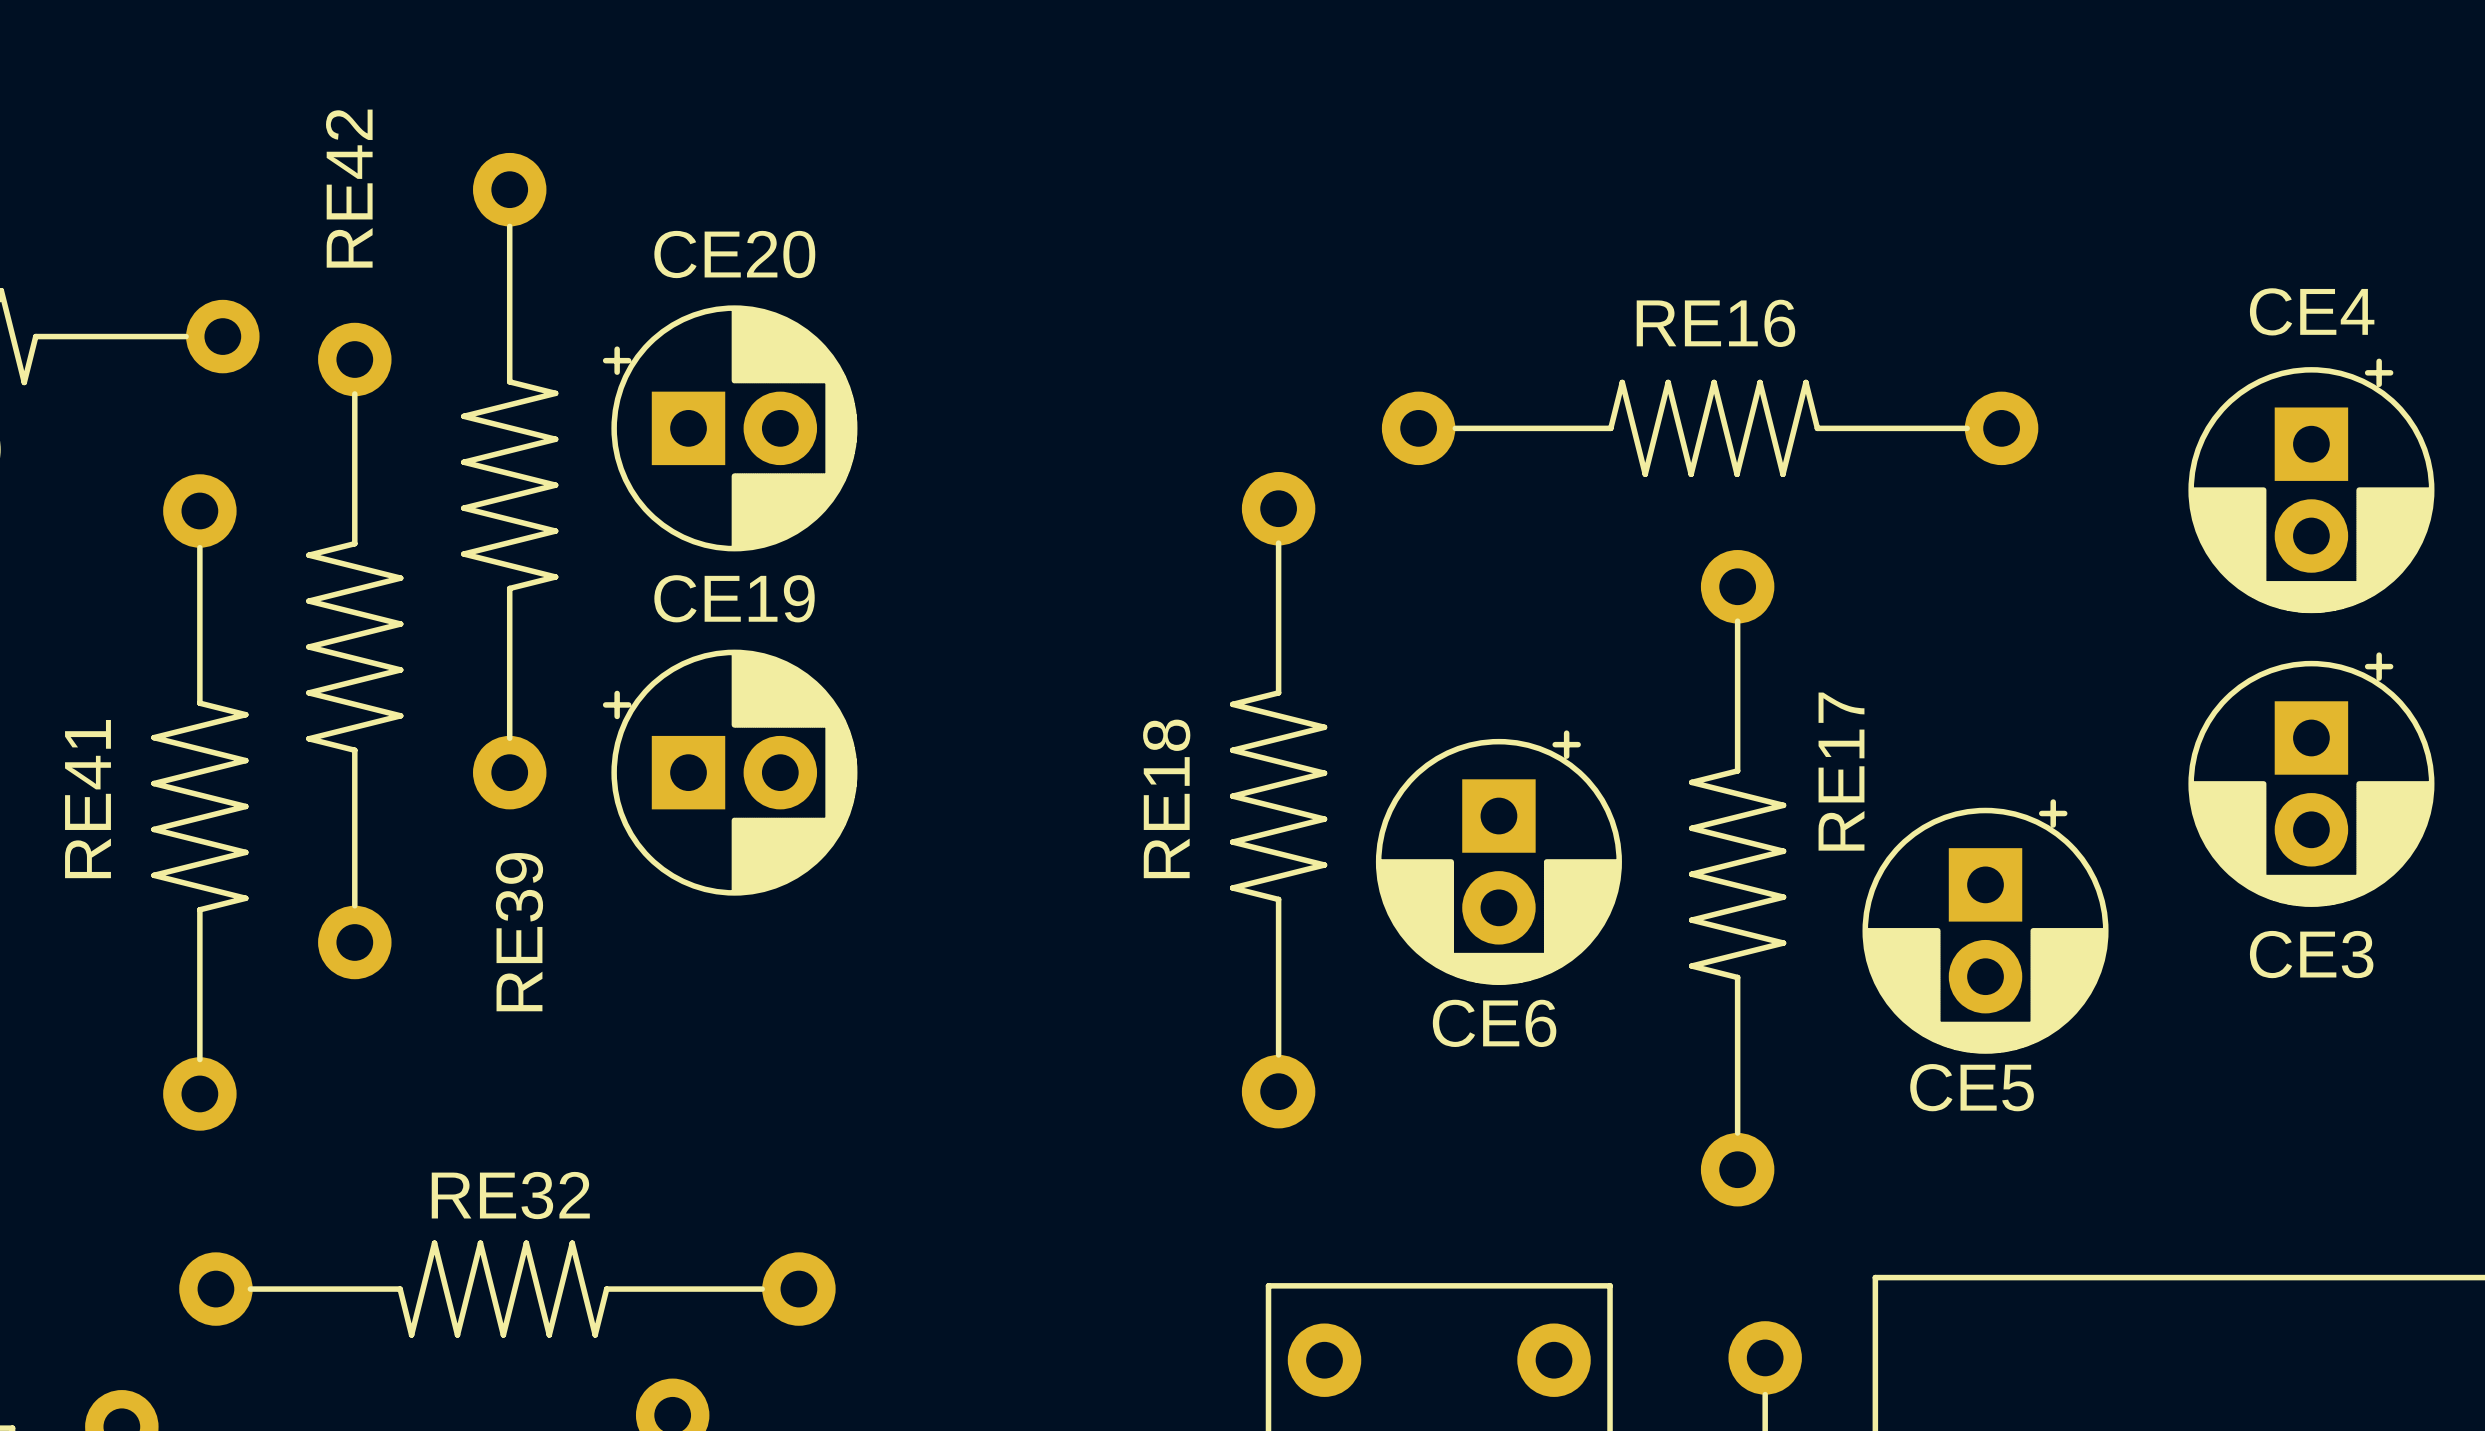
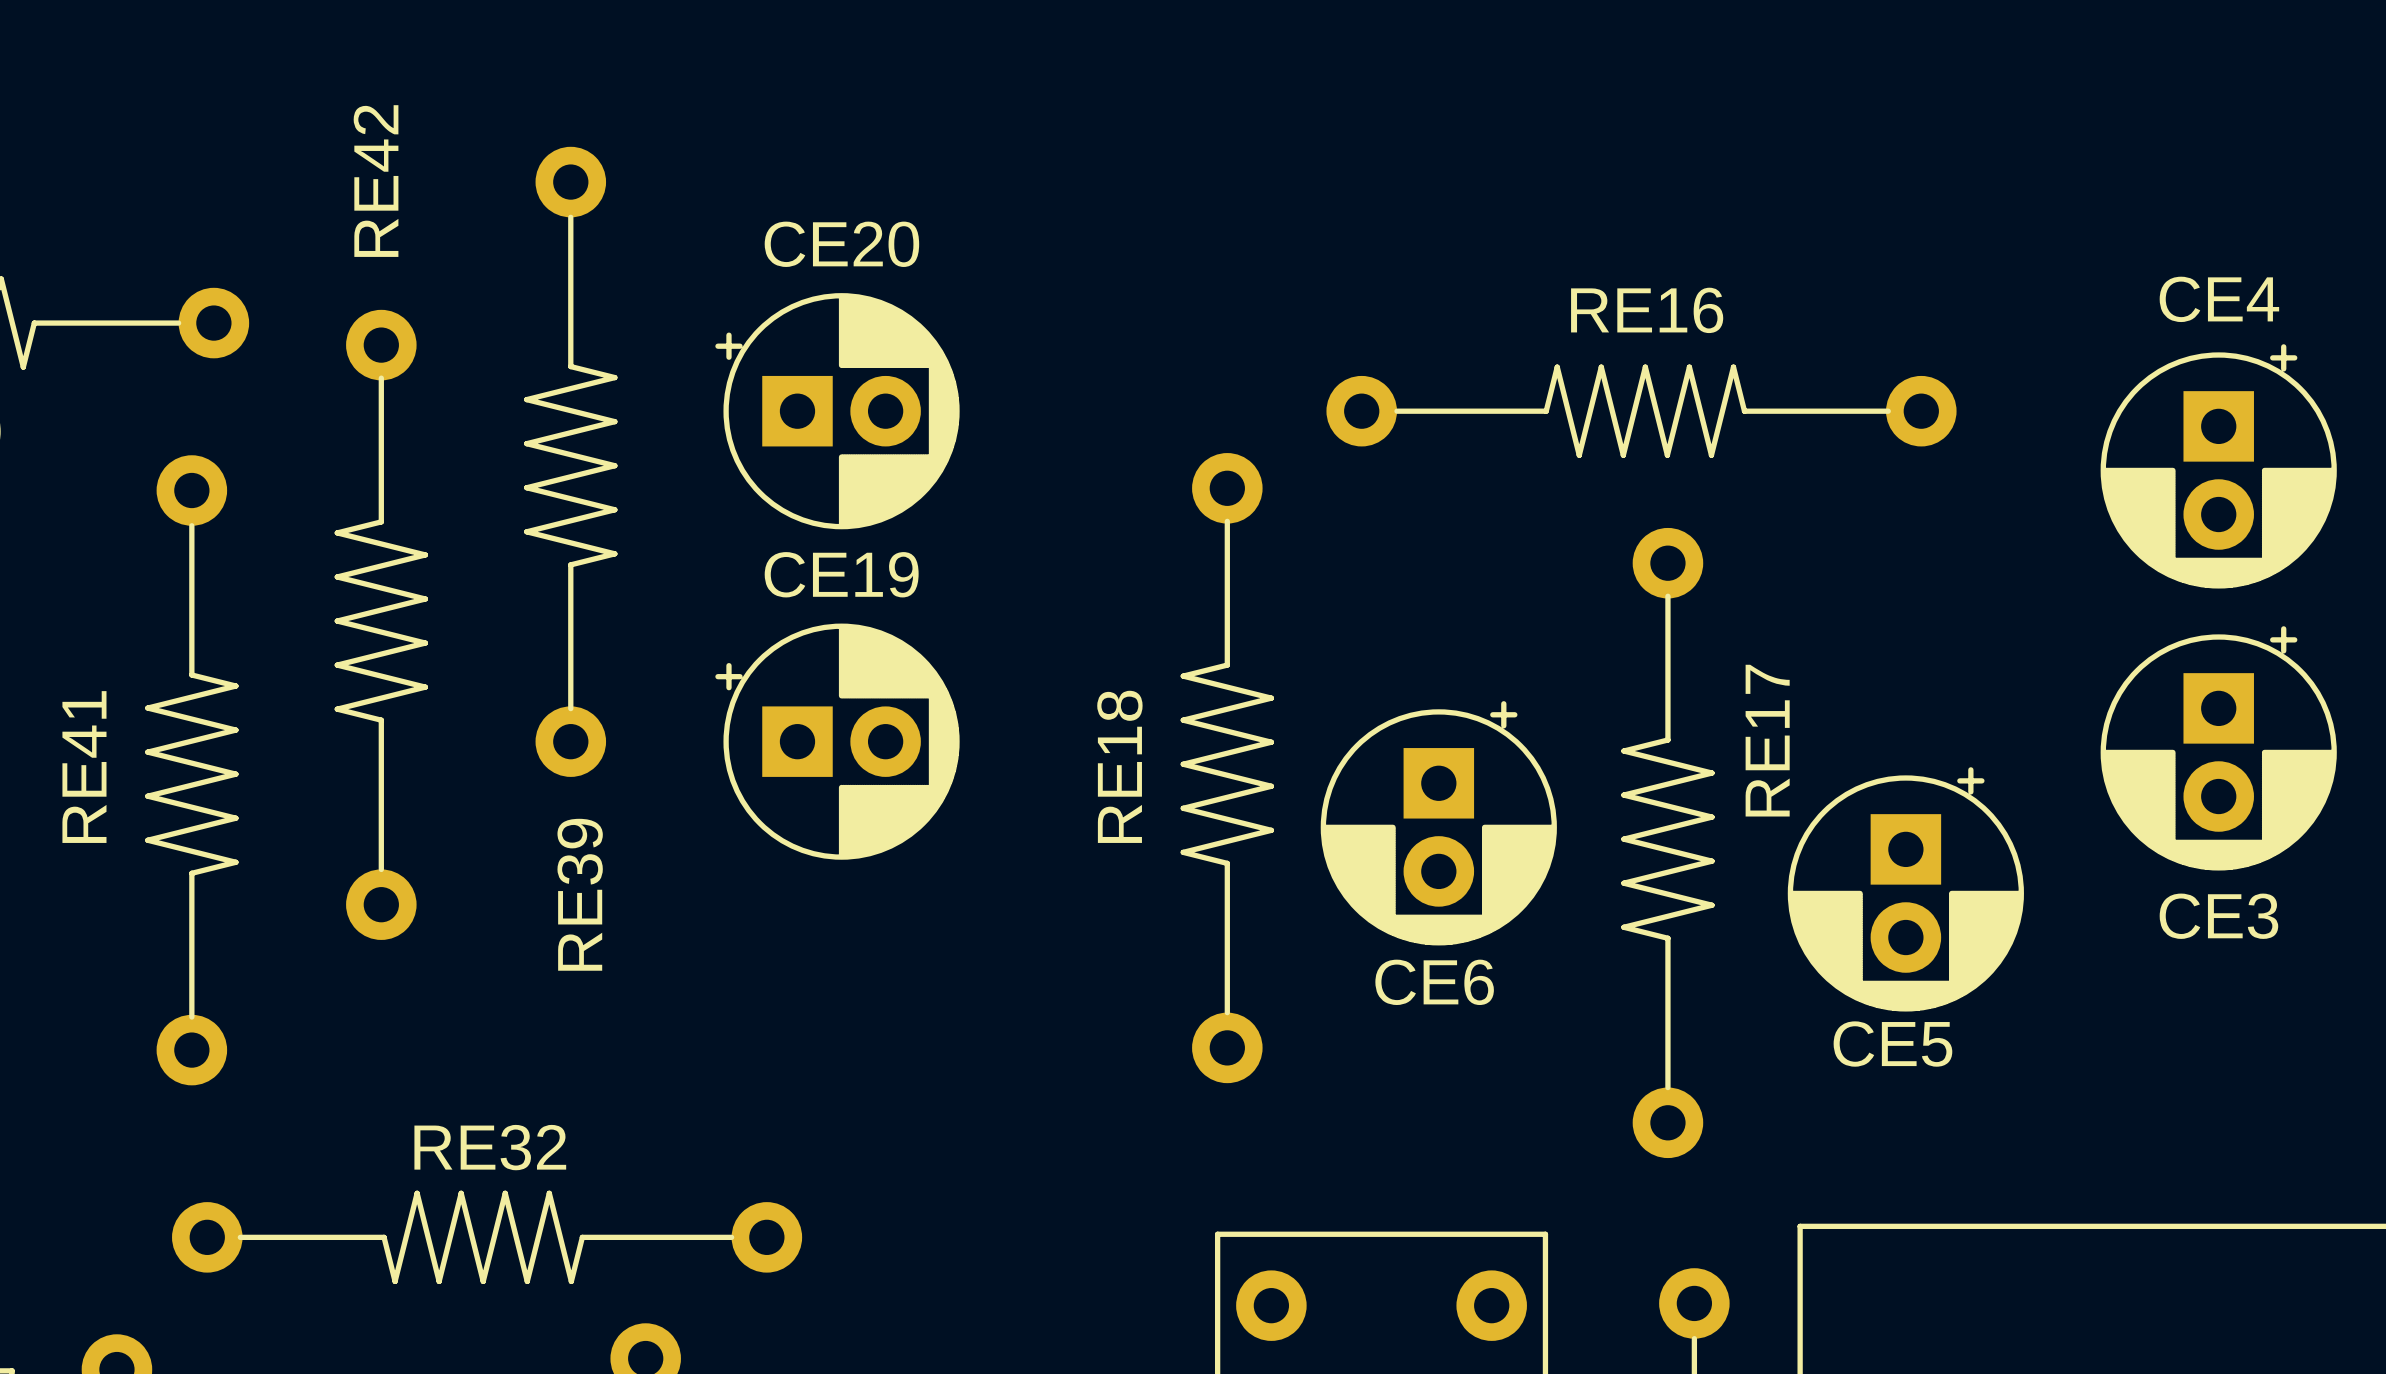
CE20 position: (730, 428) -> (837, 411)
RE39 position: (509, 481) -> (570, 461)
RE42 position: (354, 651) -> (381, 624)
CE19 position: (730, 772) -> (837, 741)

